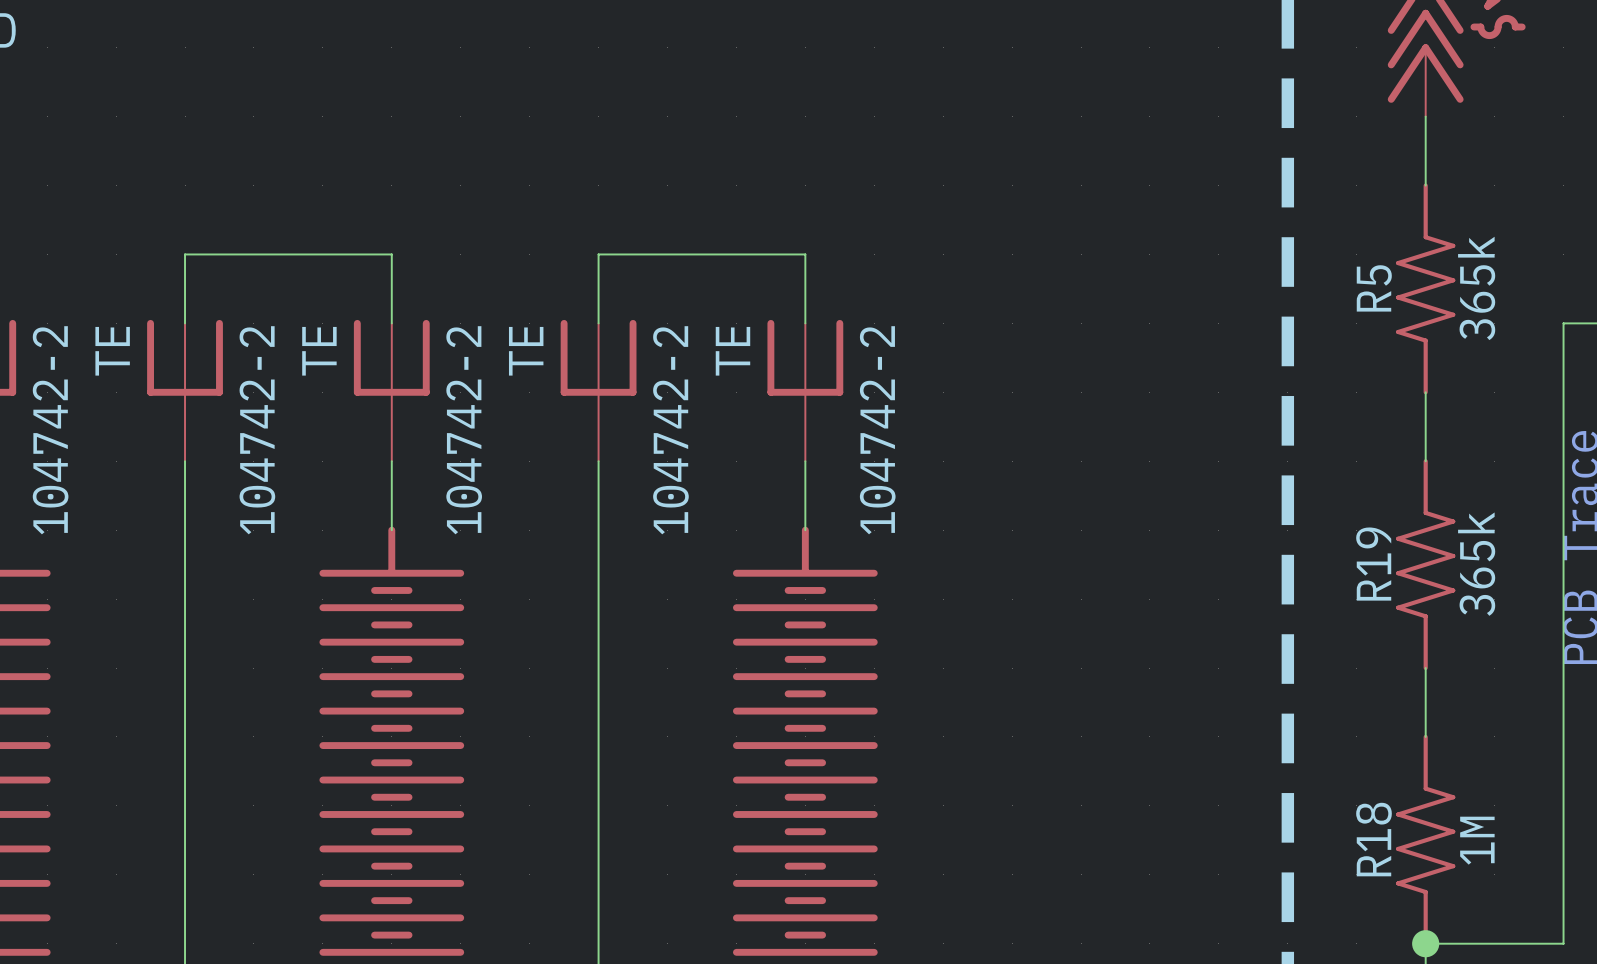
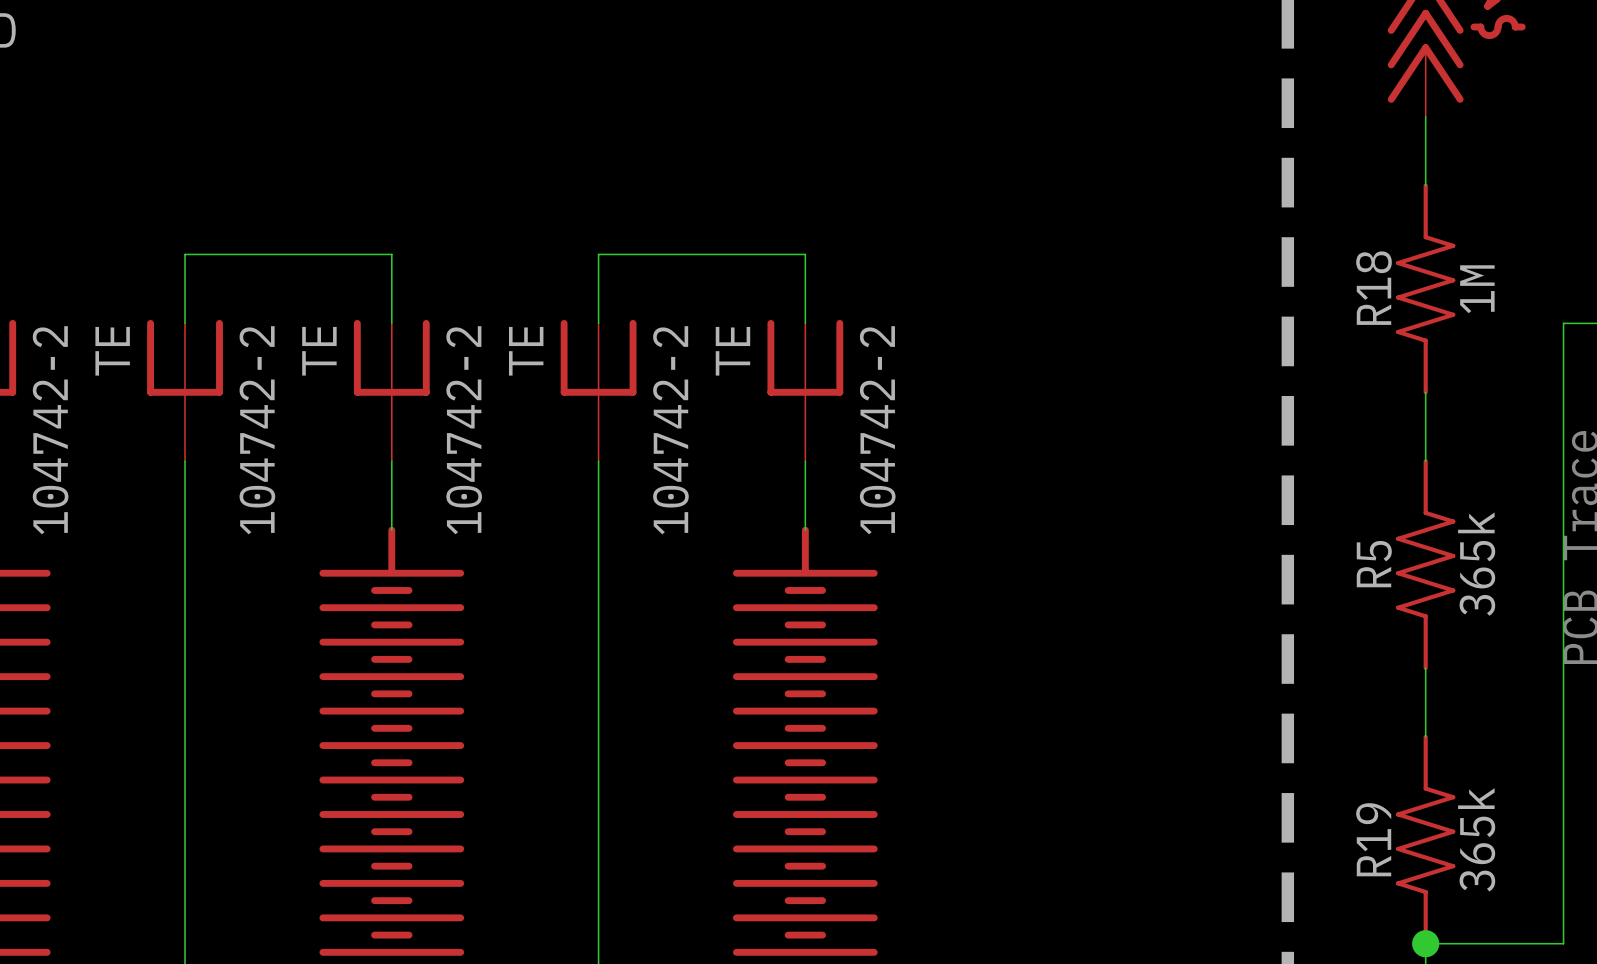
R5 name: R5 (1374, 288) -> R18 (1373, 288)
R5 value: 365k (1476, 288) -> 1M (1477, 289)
R19 name: R19 (1373, 564) -> R5 (1374, 564)
R18 name: R18 (1373, 839) -> R19 (1373, 839)
R18 value: 1M (1477, 840) -> 365k (1476, 839)

